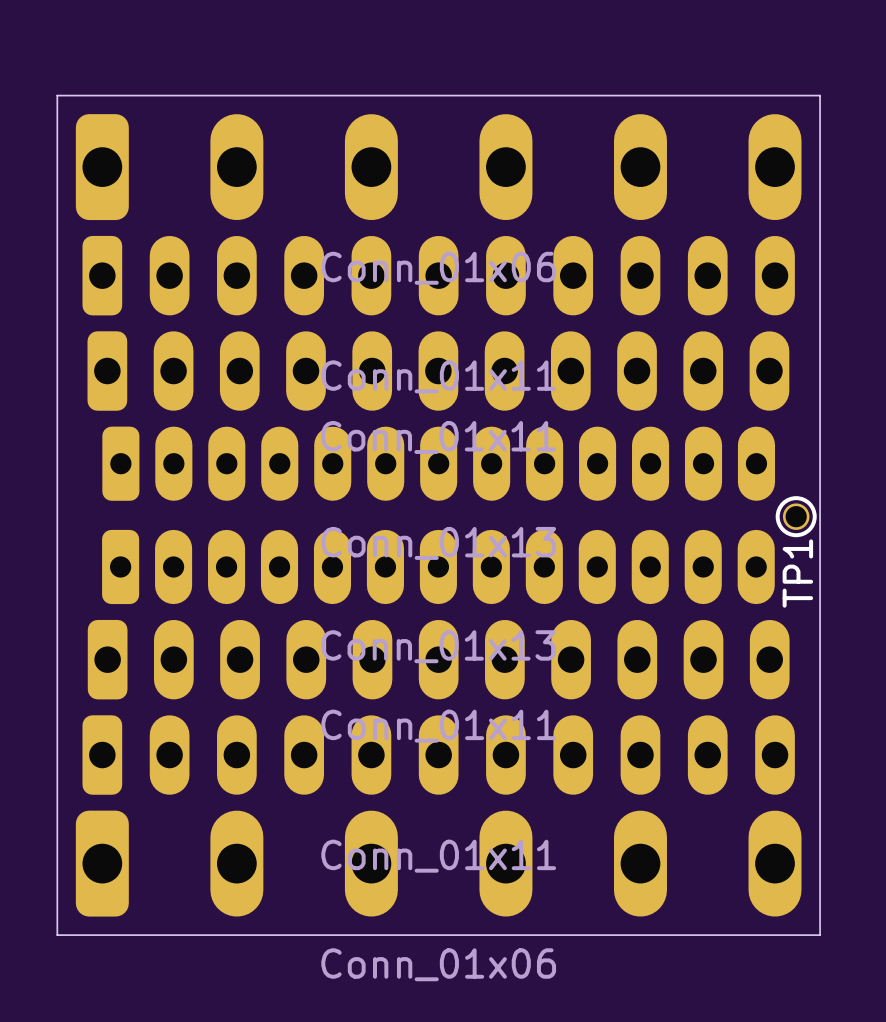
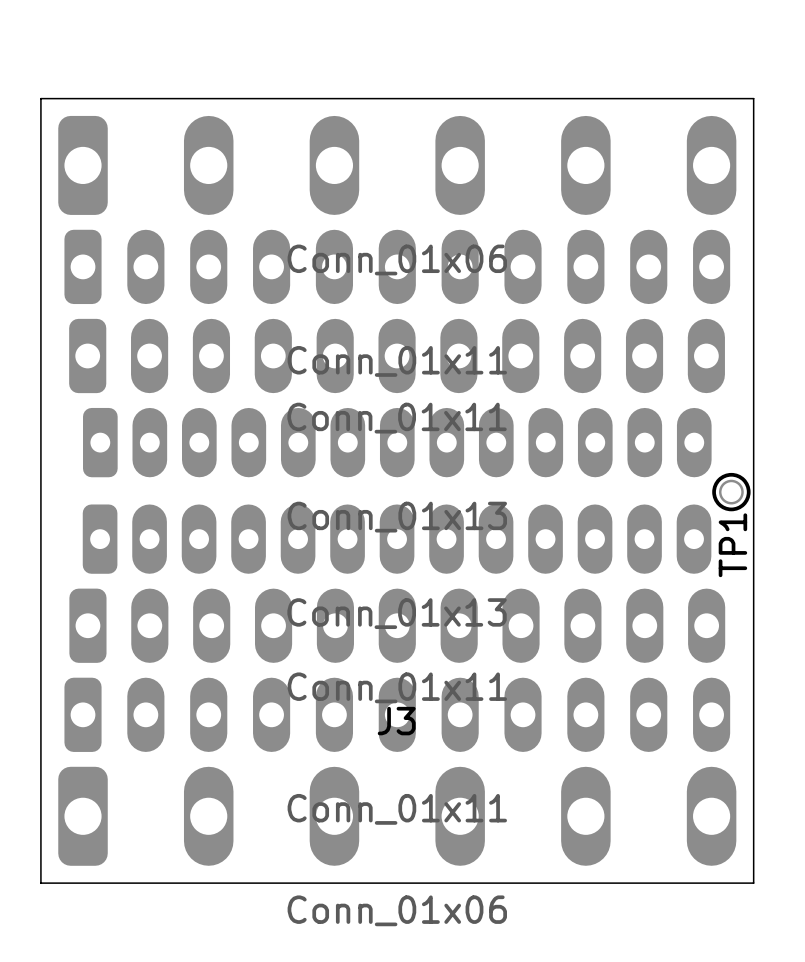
J3 name: none -> J3 (396, 721)

